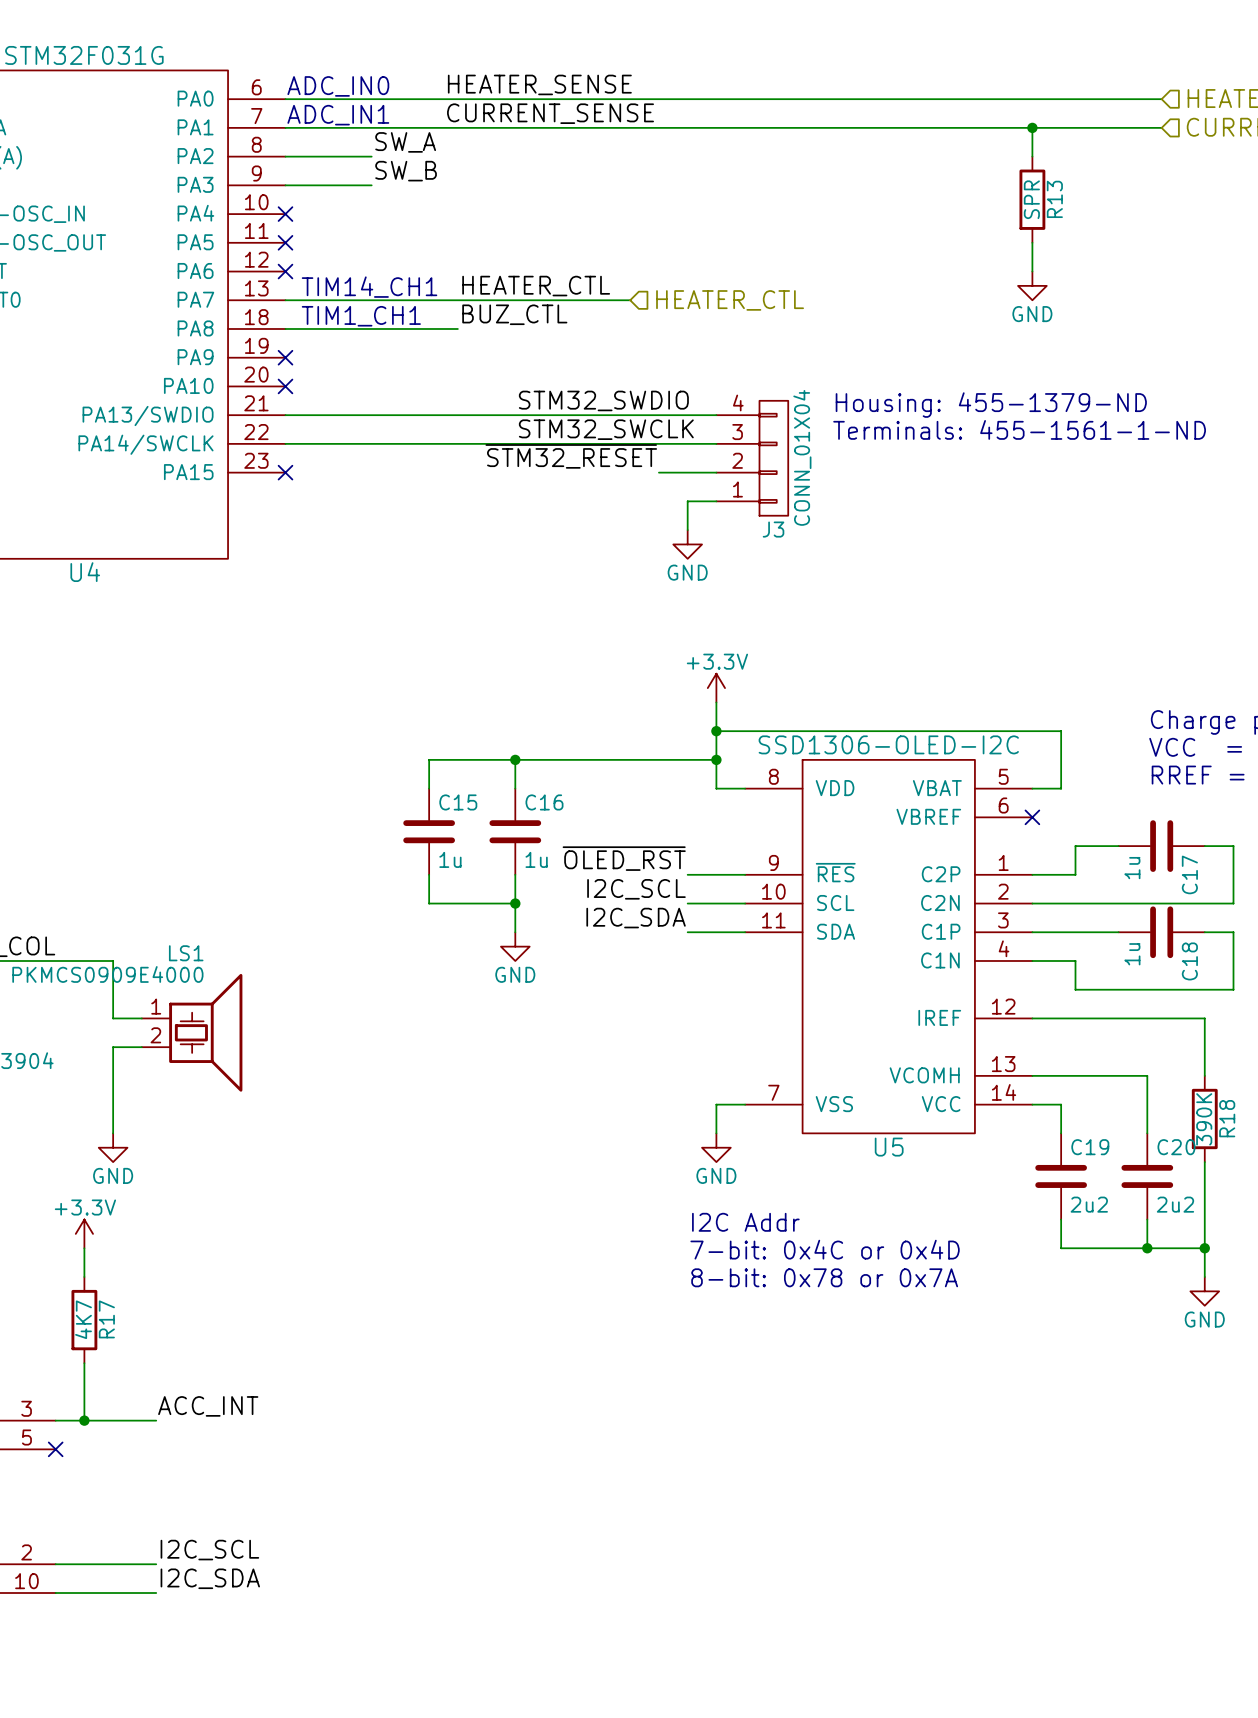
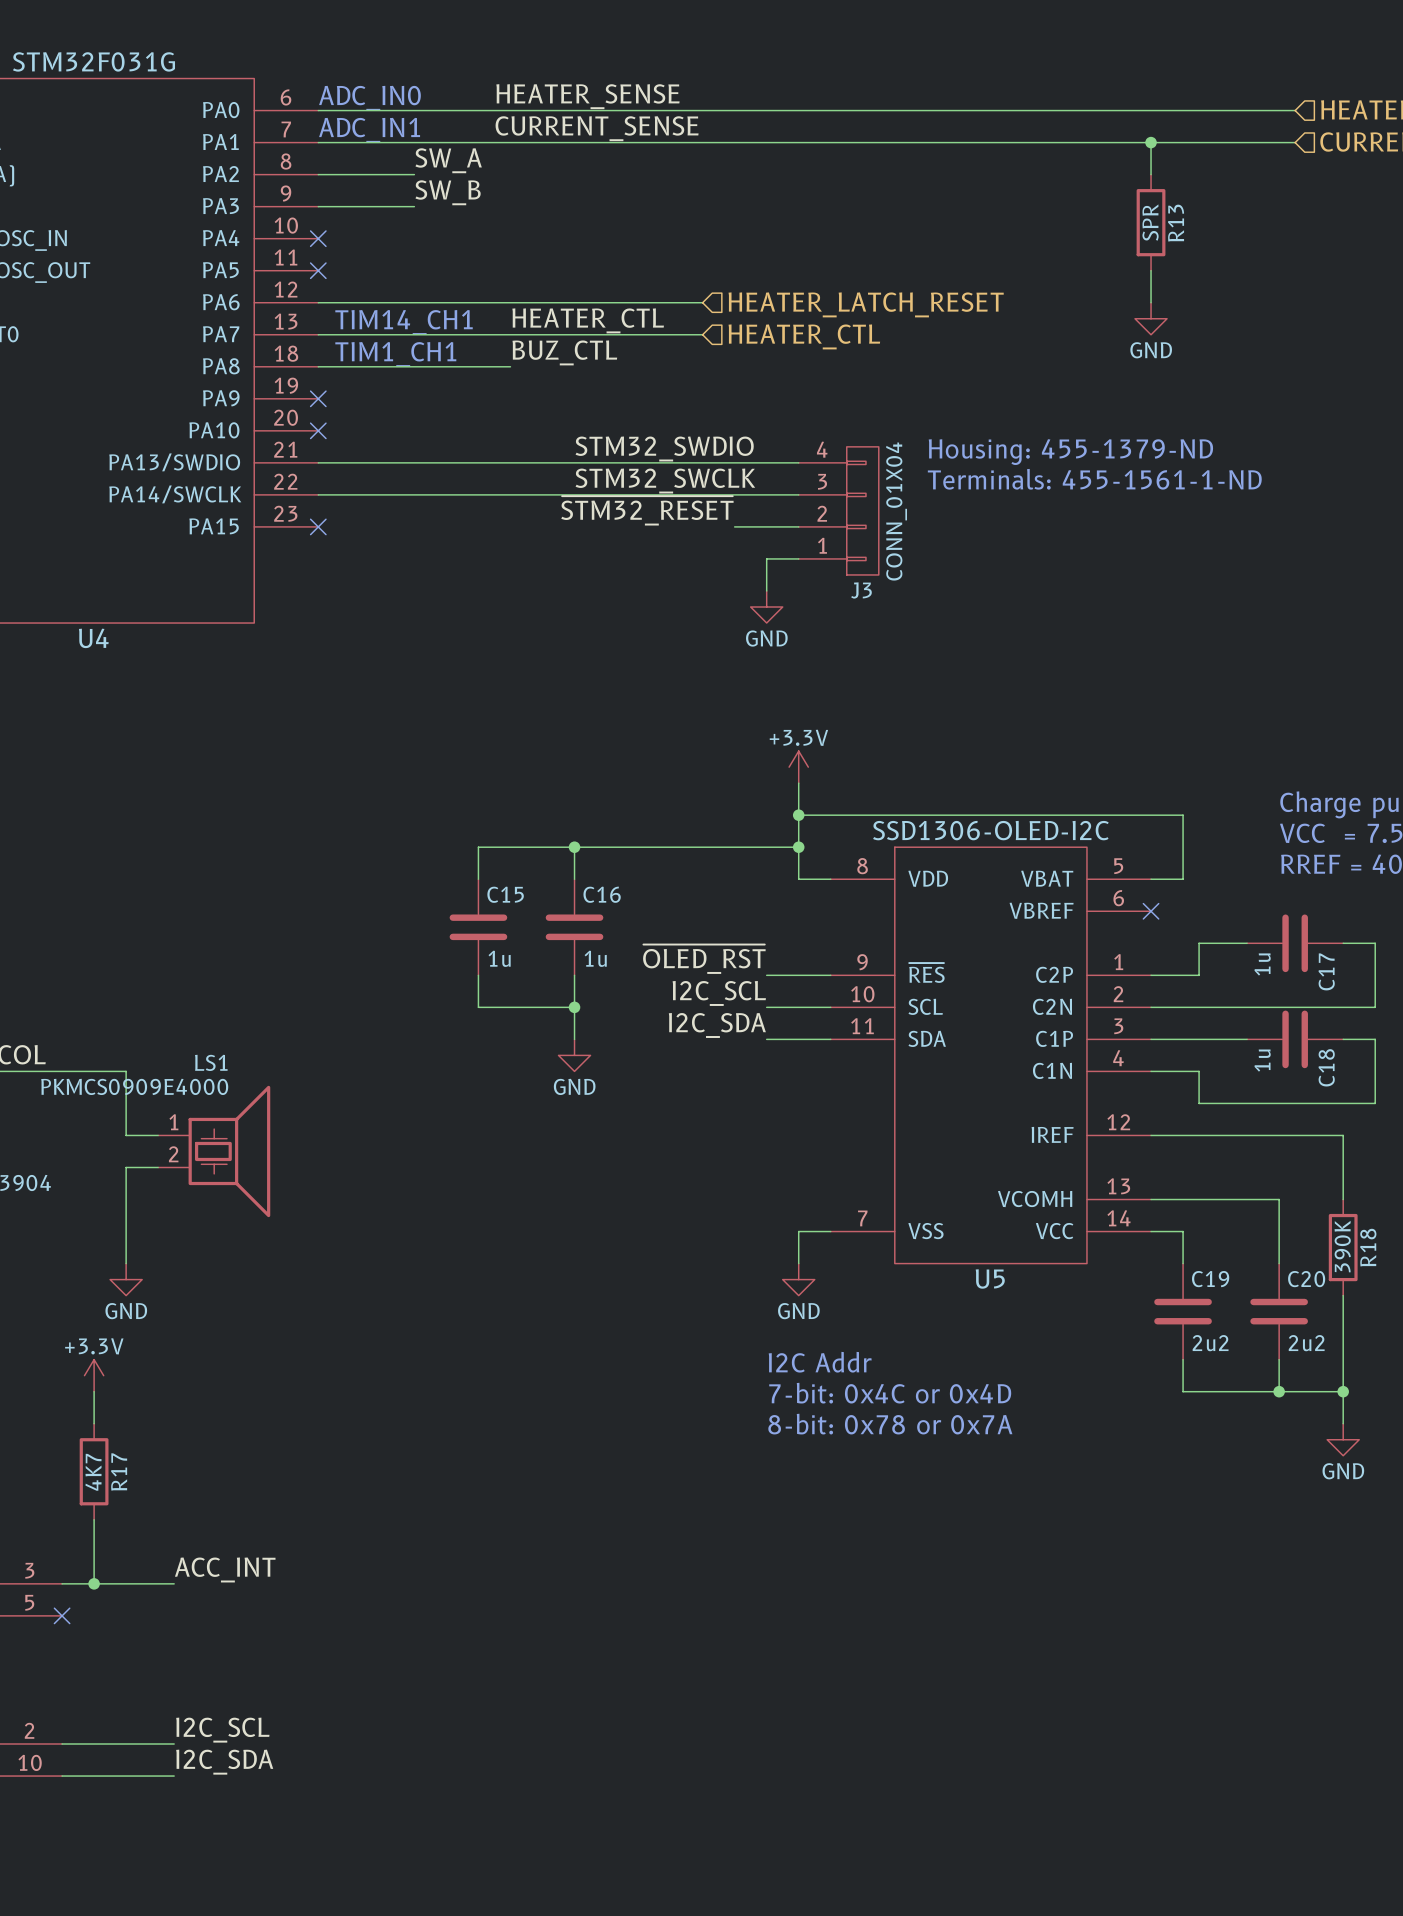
wire: none -> (318, 302) (702, 302)
no-connect mark: (285, 271) -> none
hierarchical label: none -> HEATER_LATCH_RESET (866, 304)

